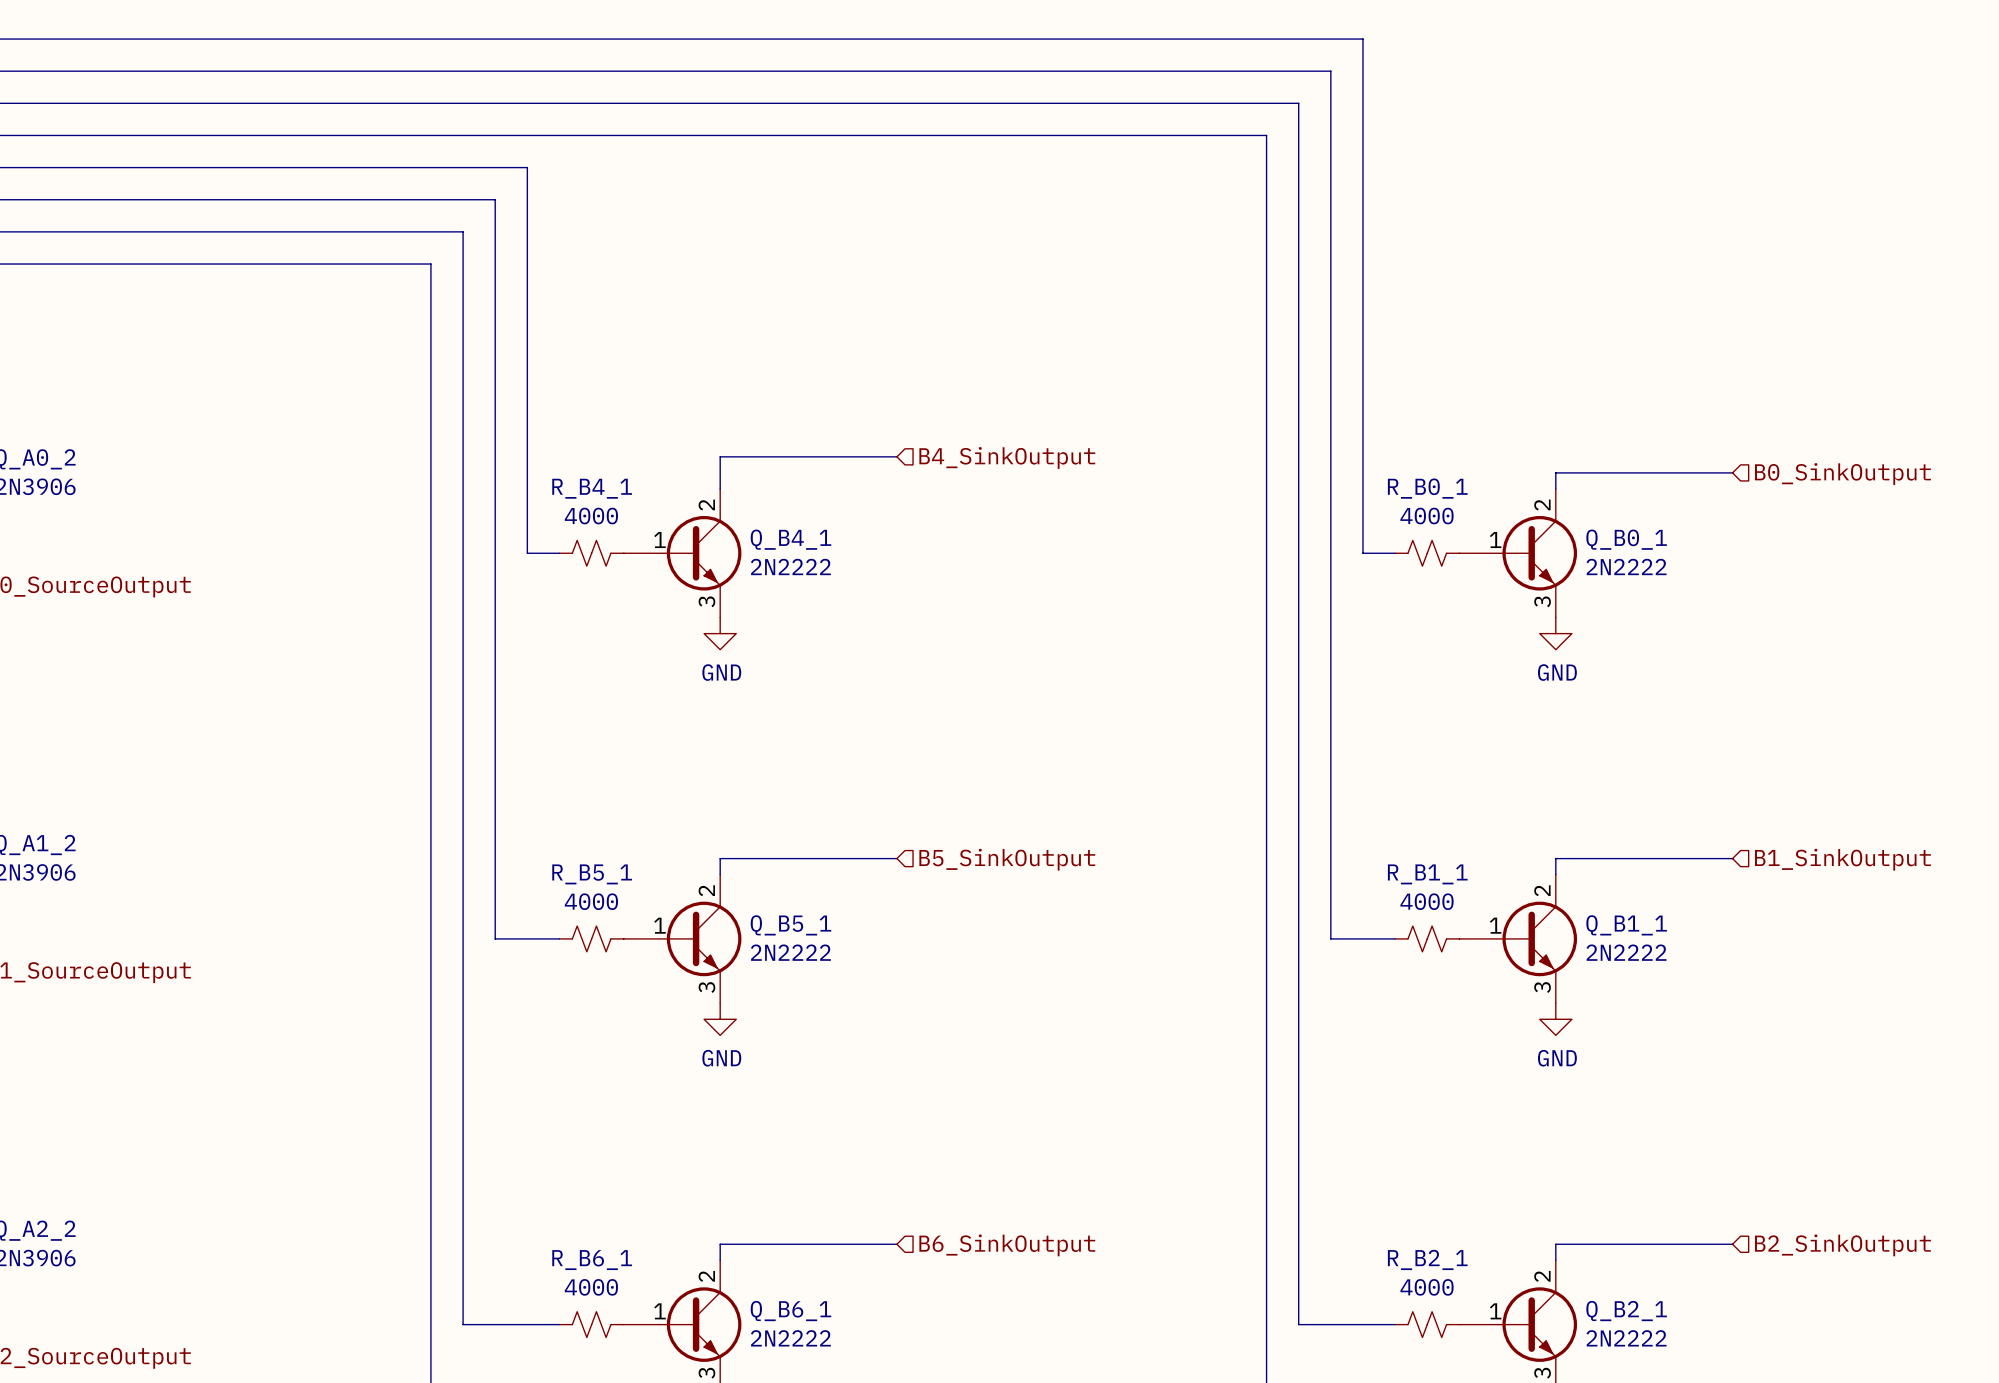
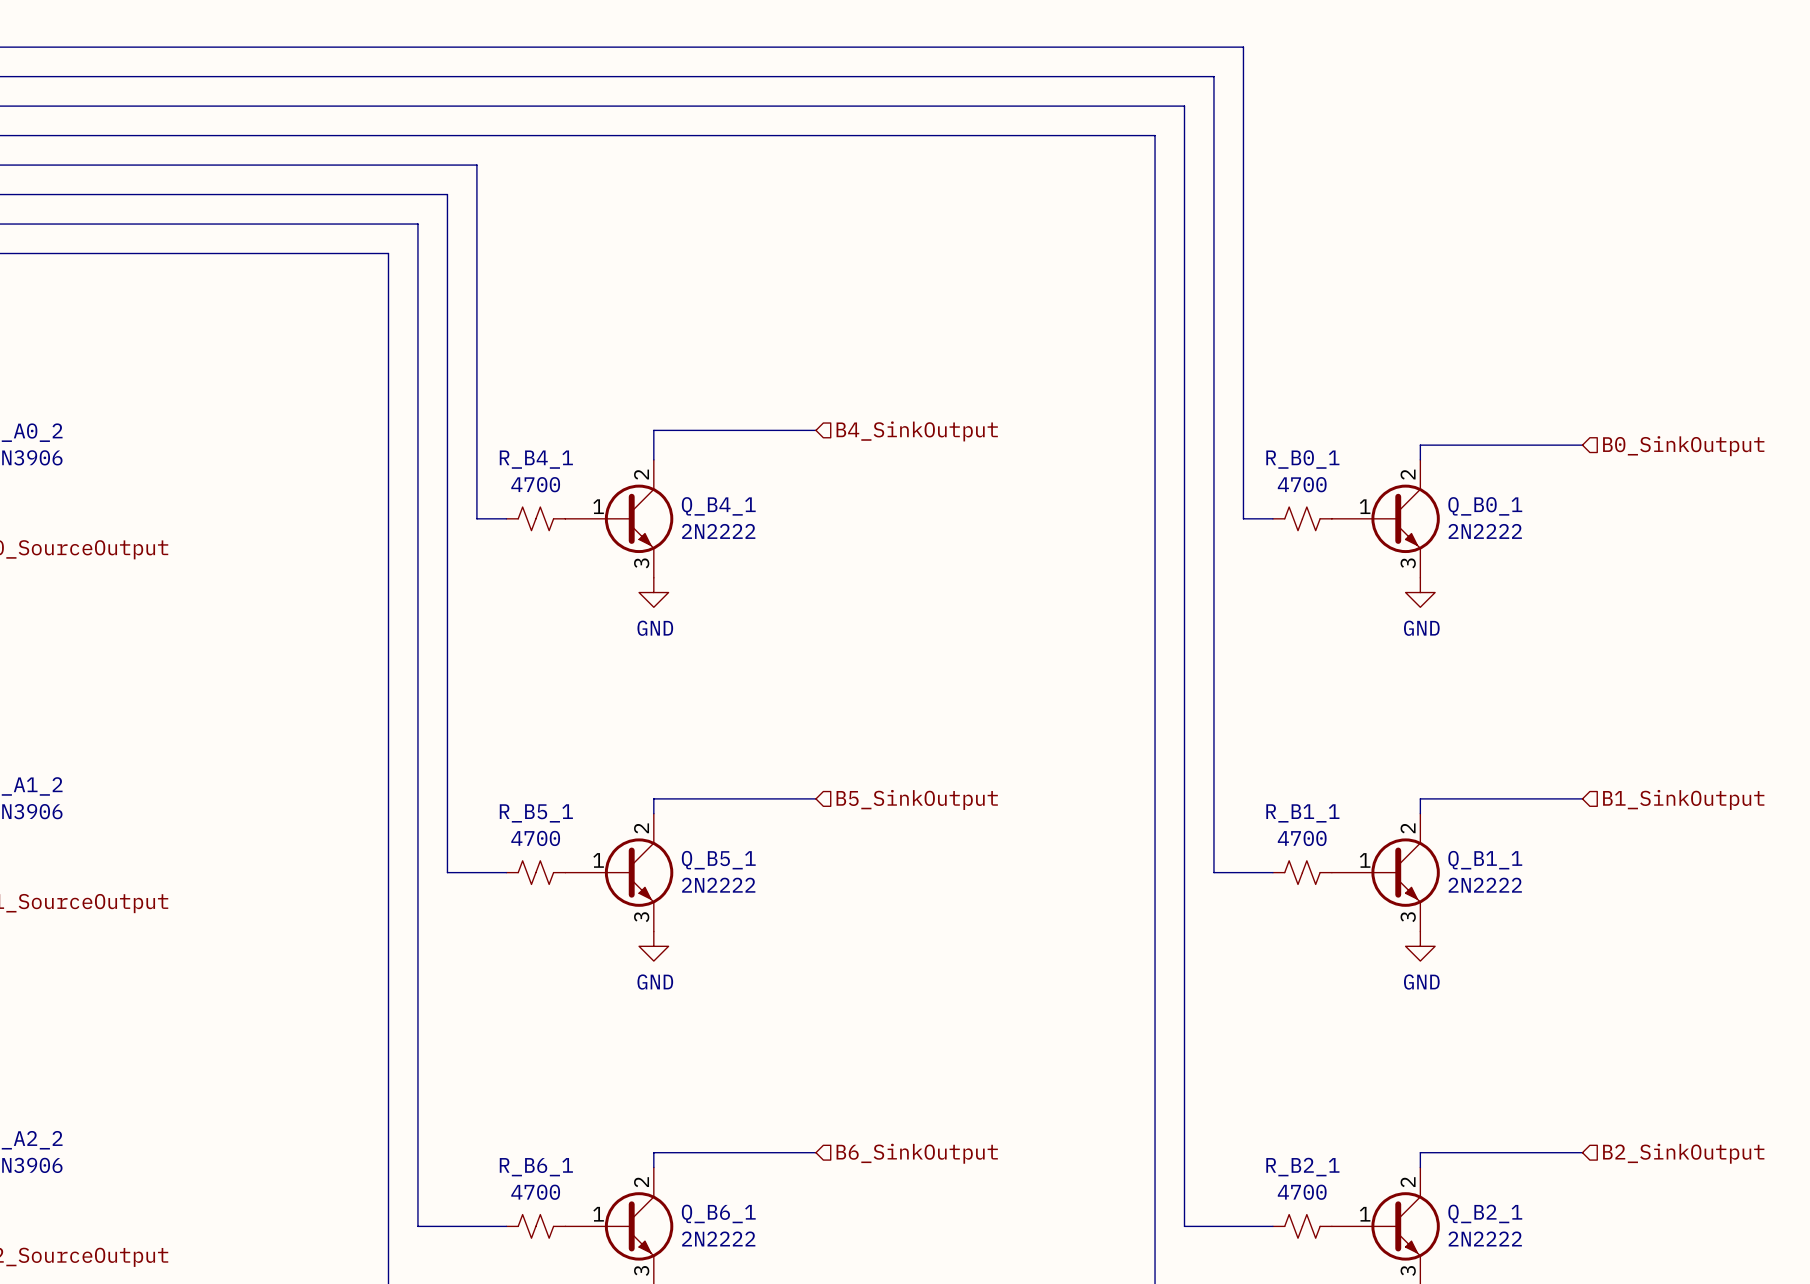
R_B4_1 value: 4000 (591, 516) -> 4700 (535, 484)
R_B0_1 value: 4000 (1427, 516) -> 4700 (1302, 484)
R_B5_1 value: 4000 (591, 901) -> 4700 (535, 838)
R_B1_1 value: 4000 (1427, 901) -> 4700 (1302, 838)
R_B6_1 value: 4000 (591, 1287) -> 4700 (535, 1192)
R_B2_1 value: 4000 (1427, 1287) -> 4700 (1302, 1192)

